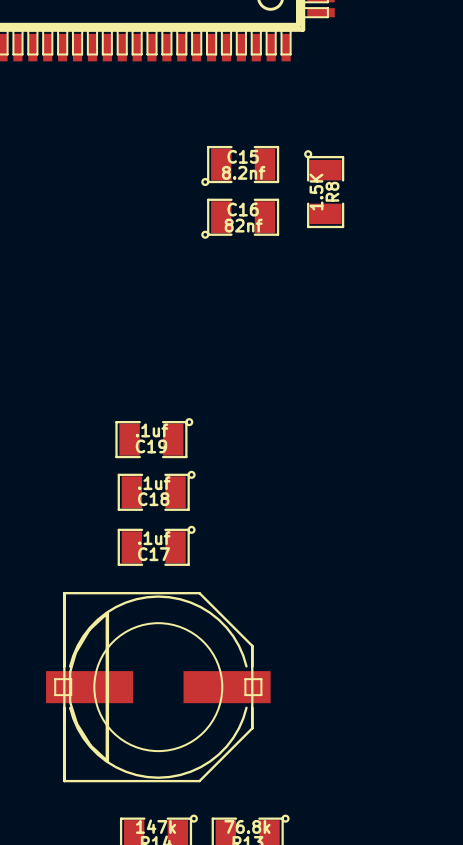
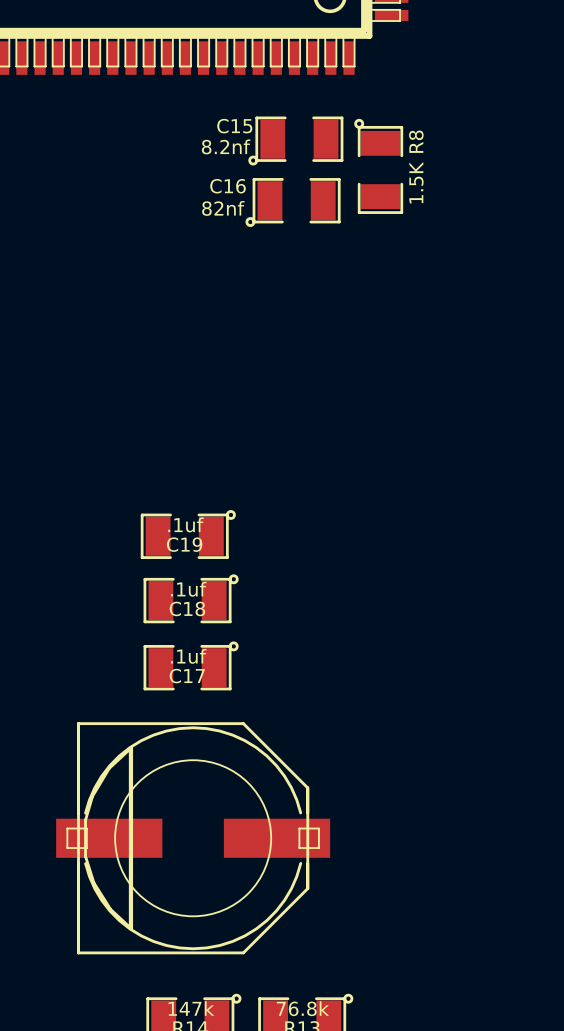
C15: none -> 8.2nf (295, 140)
C15 name: C15 (243, 156) -> C16 (228, 186)
C15 value: 8.2nf (243, 172) -> 82nf (223, 208)
R8 position: (324, 189) -> (378, 166)
R8 name position: R8 (332, 191) -> R8 (416, 141)
R8 value position: 1.5K (316, 192) -> 1.5K (416, 182)
C16: 82nf (240, 218) -> none

